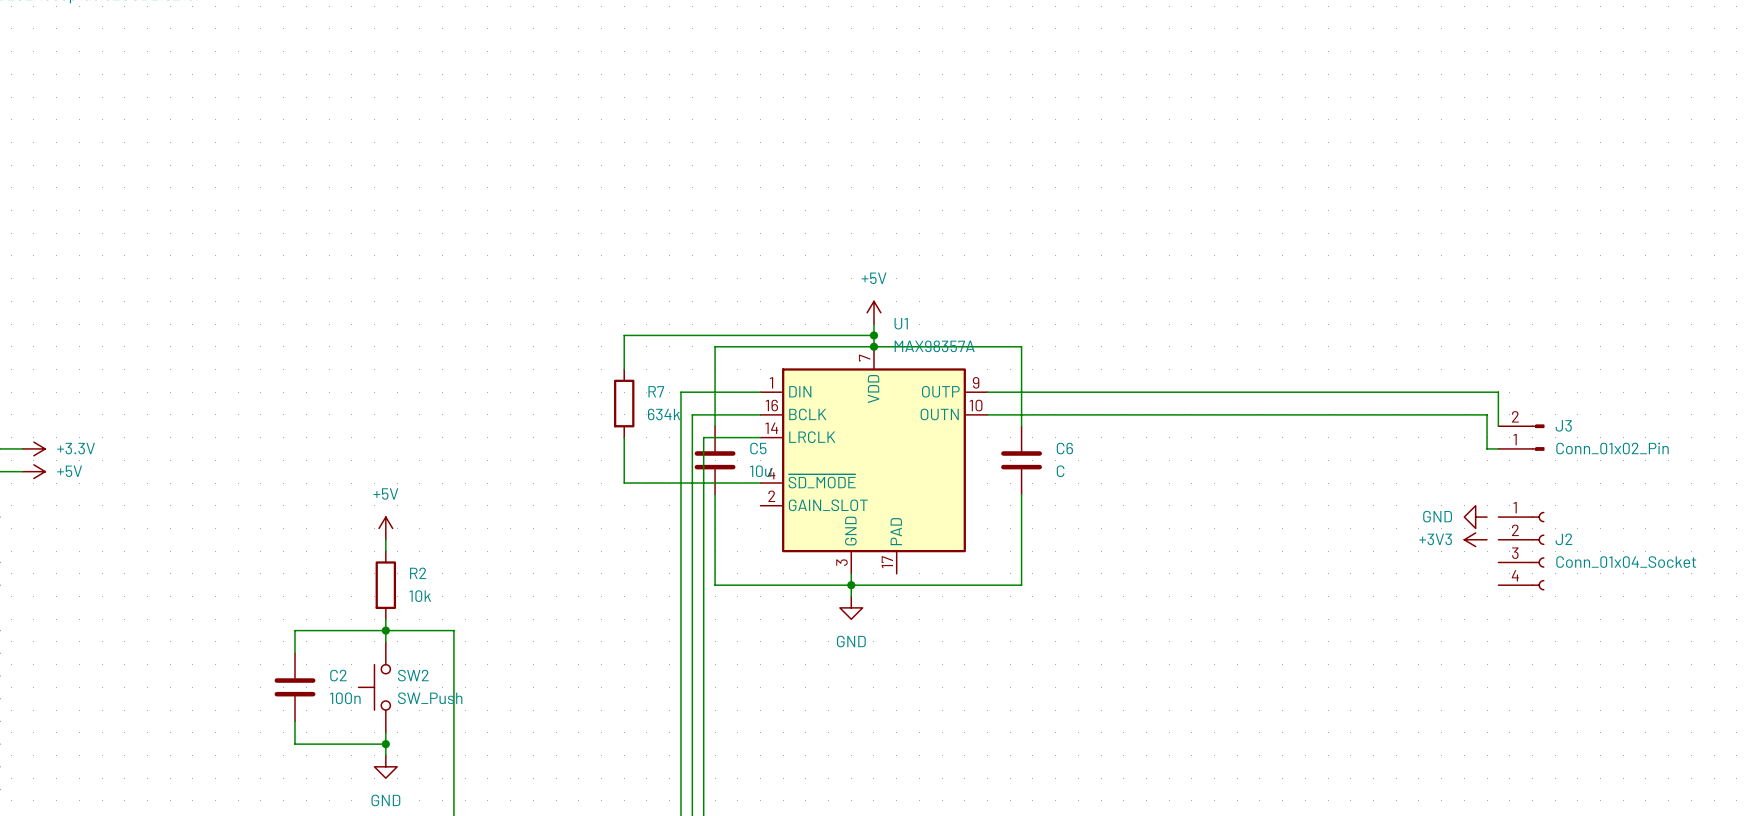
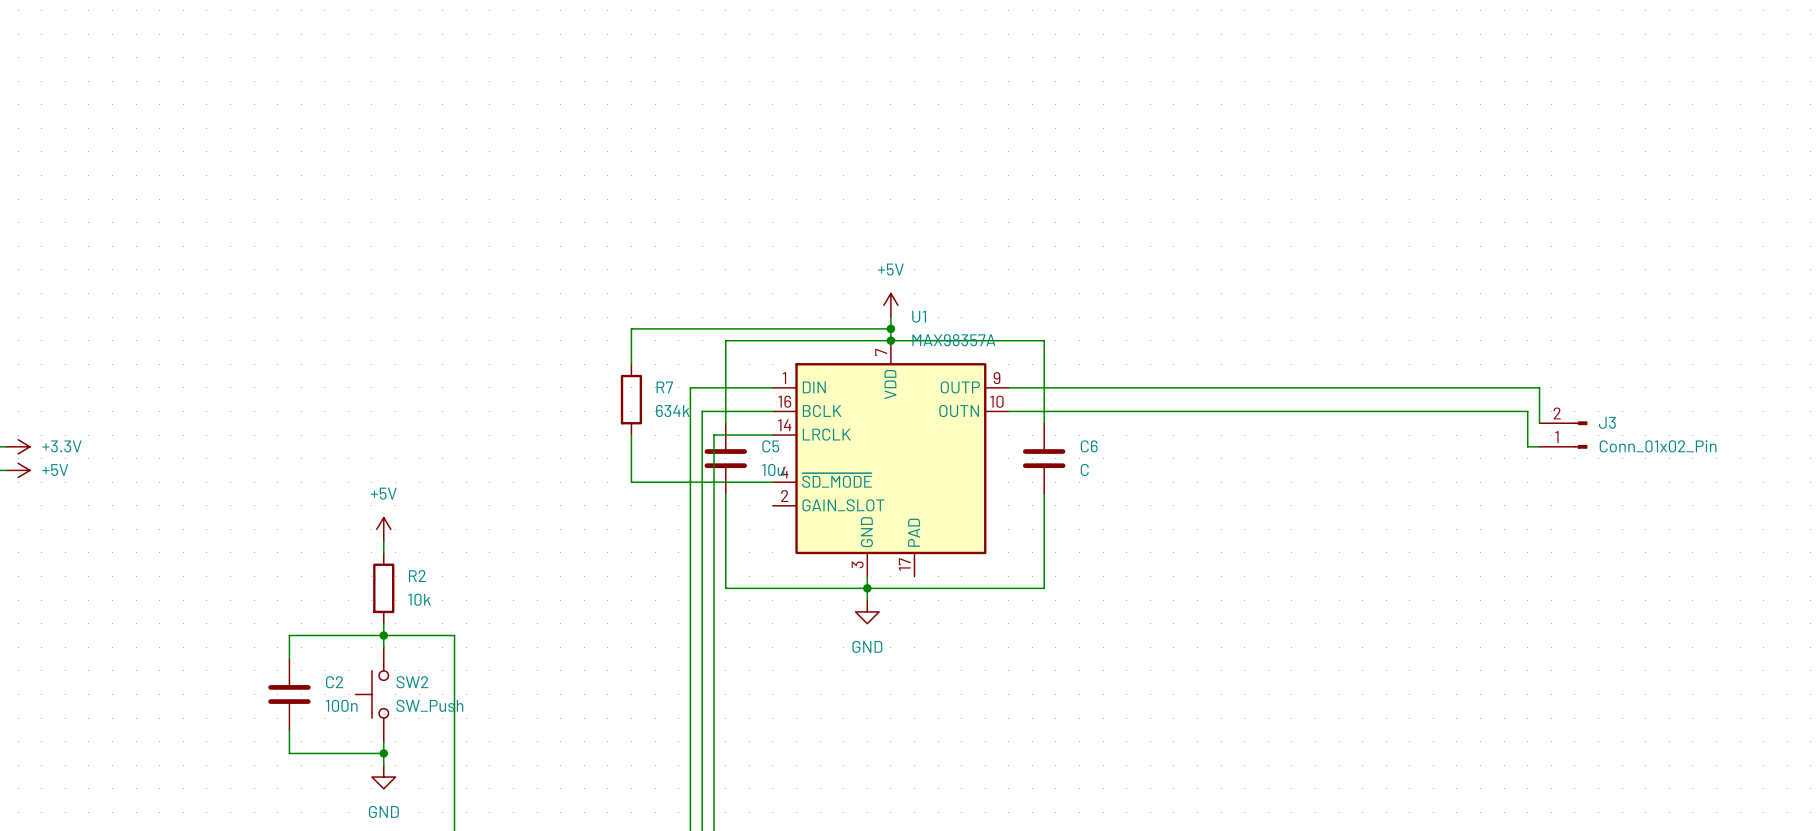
power symbol: GND (1475, 517) -> none
power symbol: +3V3 (1475, 539) -> none
J2: Conn_01x04_Socket (1521, 551) -> none

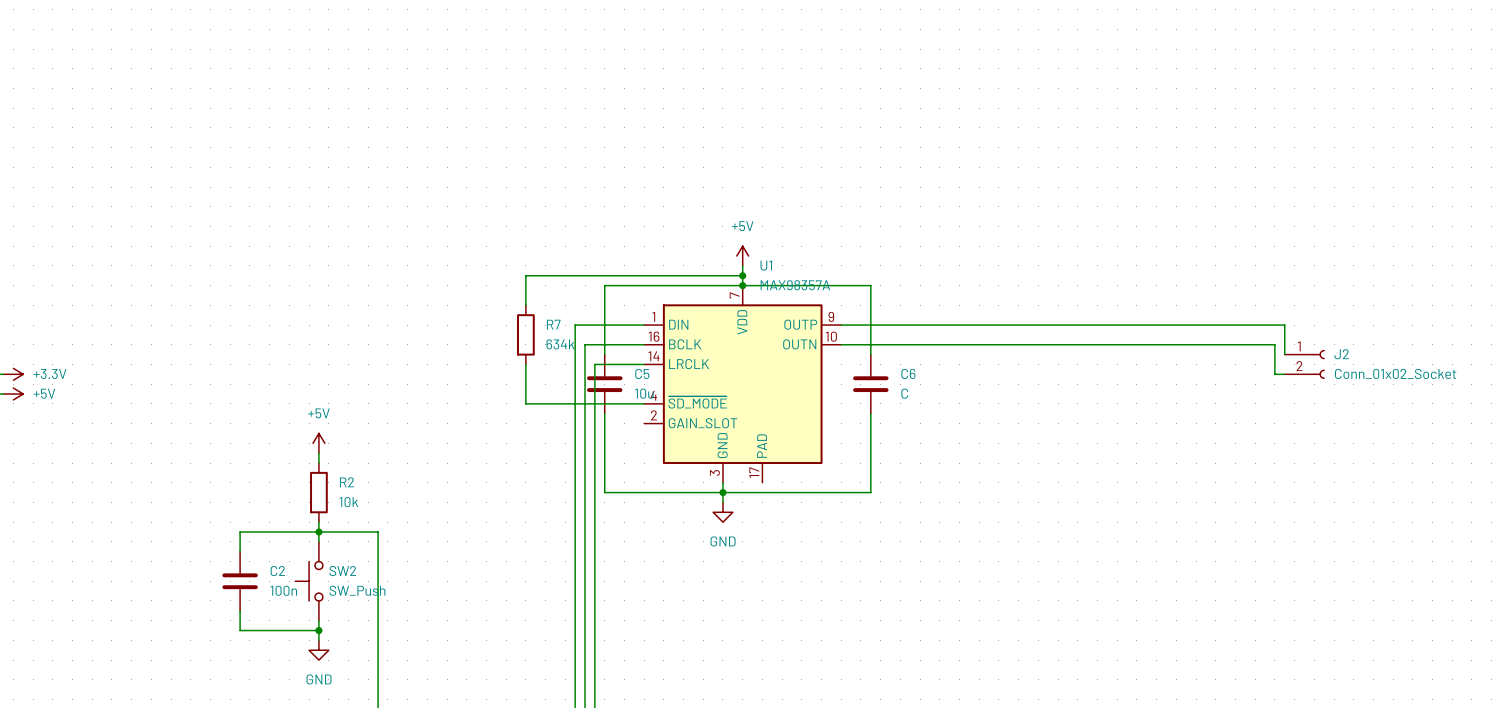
J3: Conn_01x02_Pin (1563, 435) -> none
J2: none -> Conn_01x02_Socket (1304, 364)

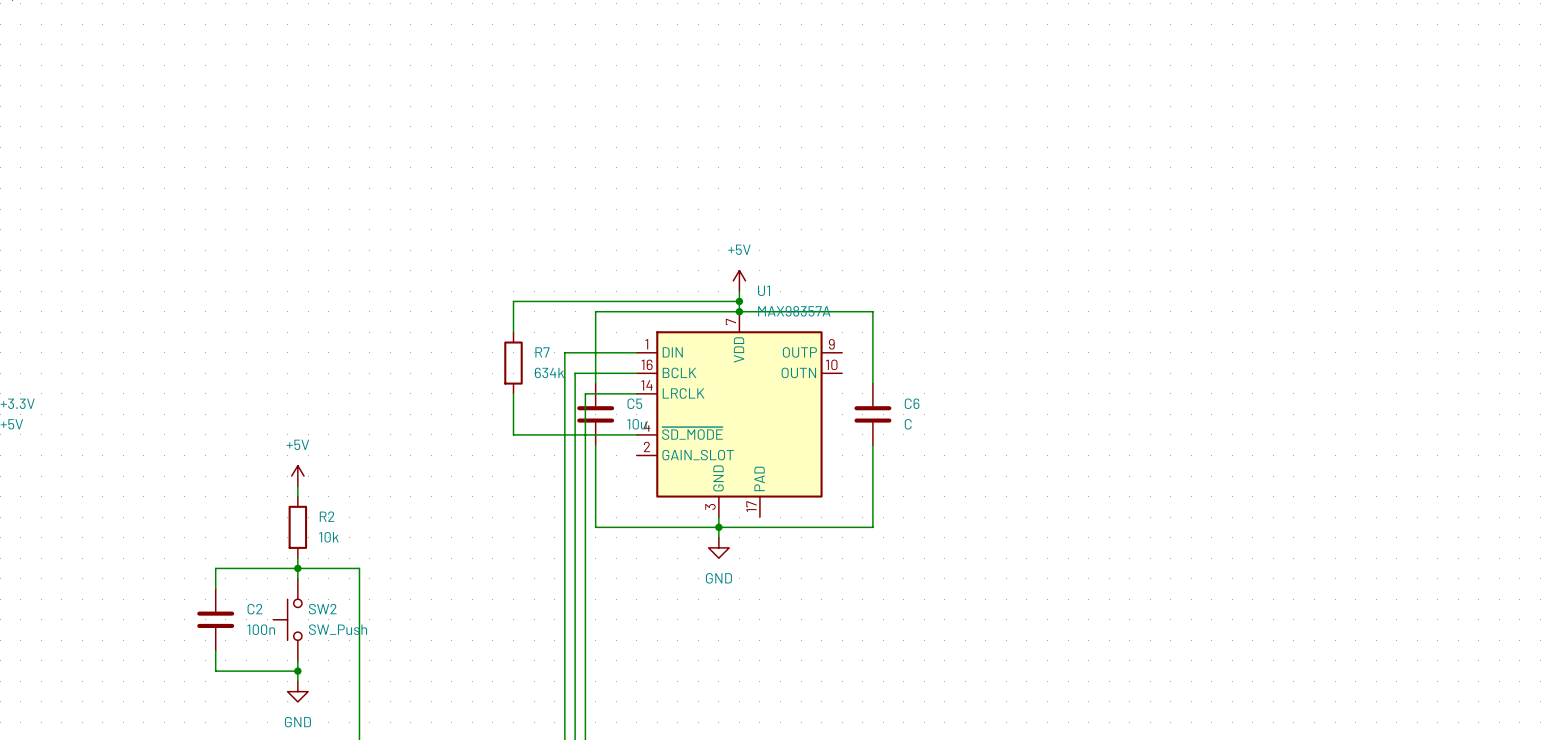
wire: (841, 325) (1284, 325) (1284, 354) -> none
wire: (841, 344) (1274, 344) (1274, 374) (1284, 374) -> none
J2: Conn_01x02_Socket (1304, 364) -> none

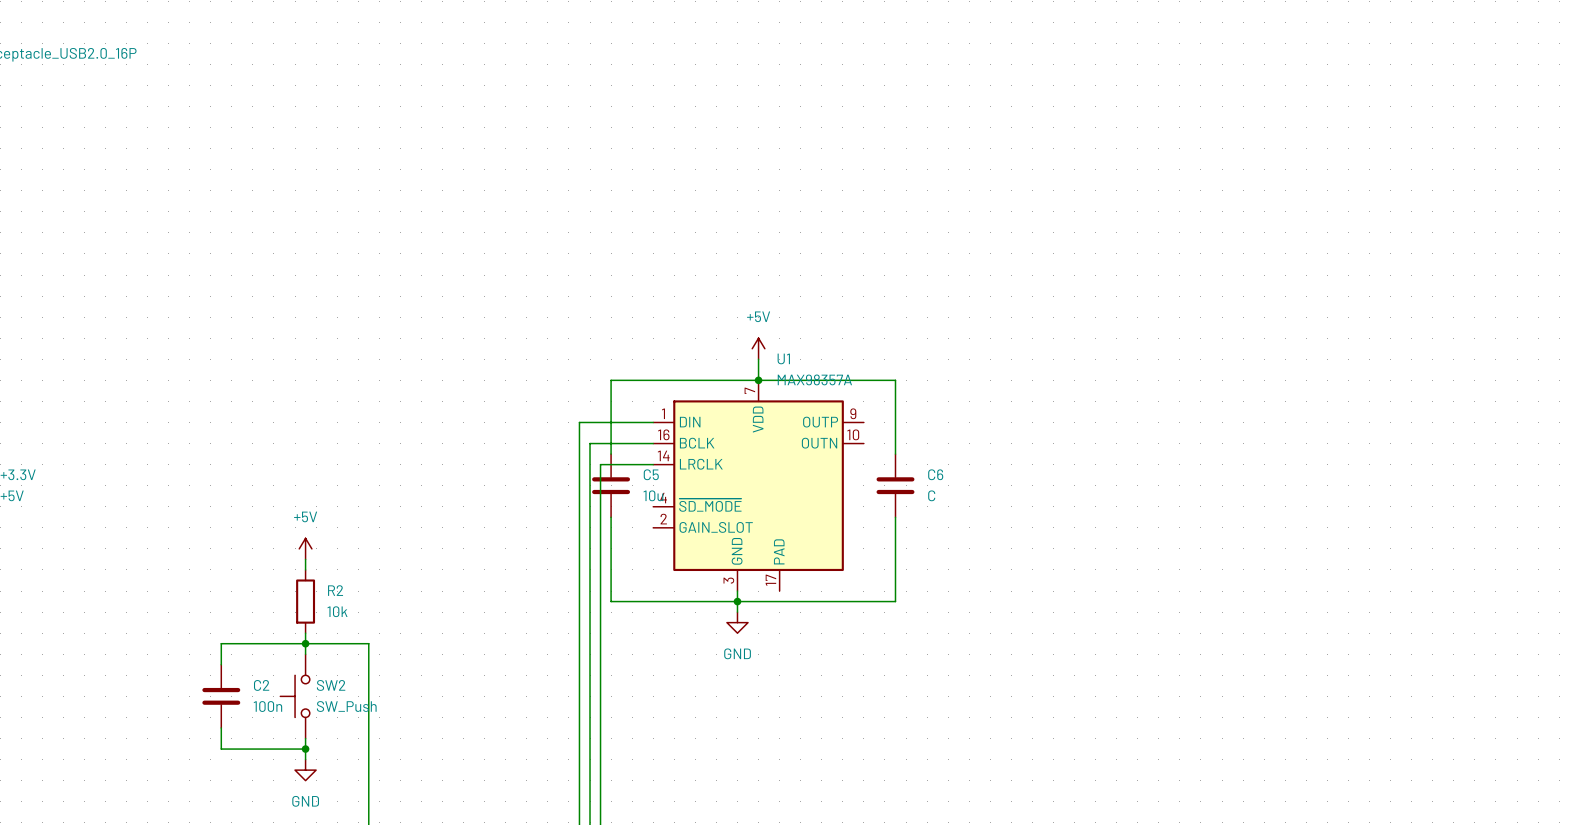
wire: (739, 301) (513, 301) (513, 332) -> none
junction: (739, 301) -> none
R7: 634k (513, 363) -> none
wire: (513, 393) (513, 434) (636, 434) -> none

